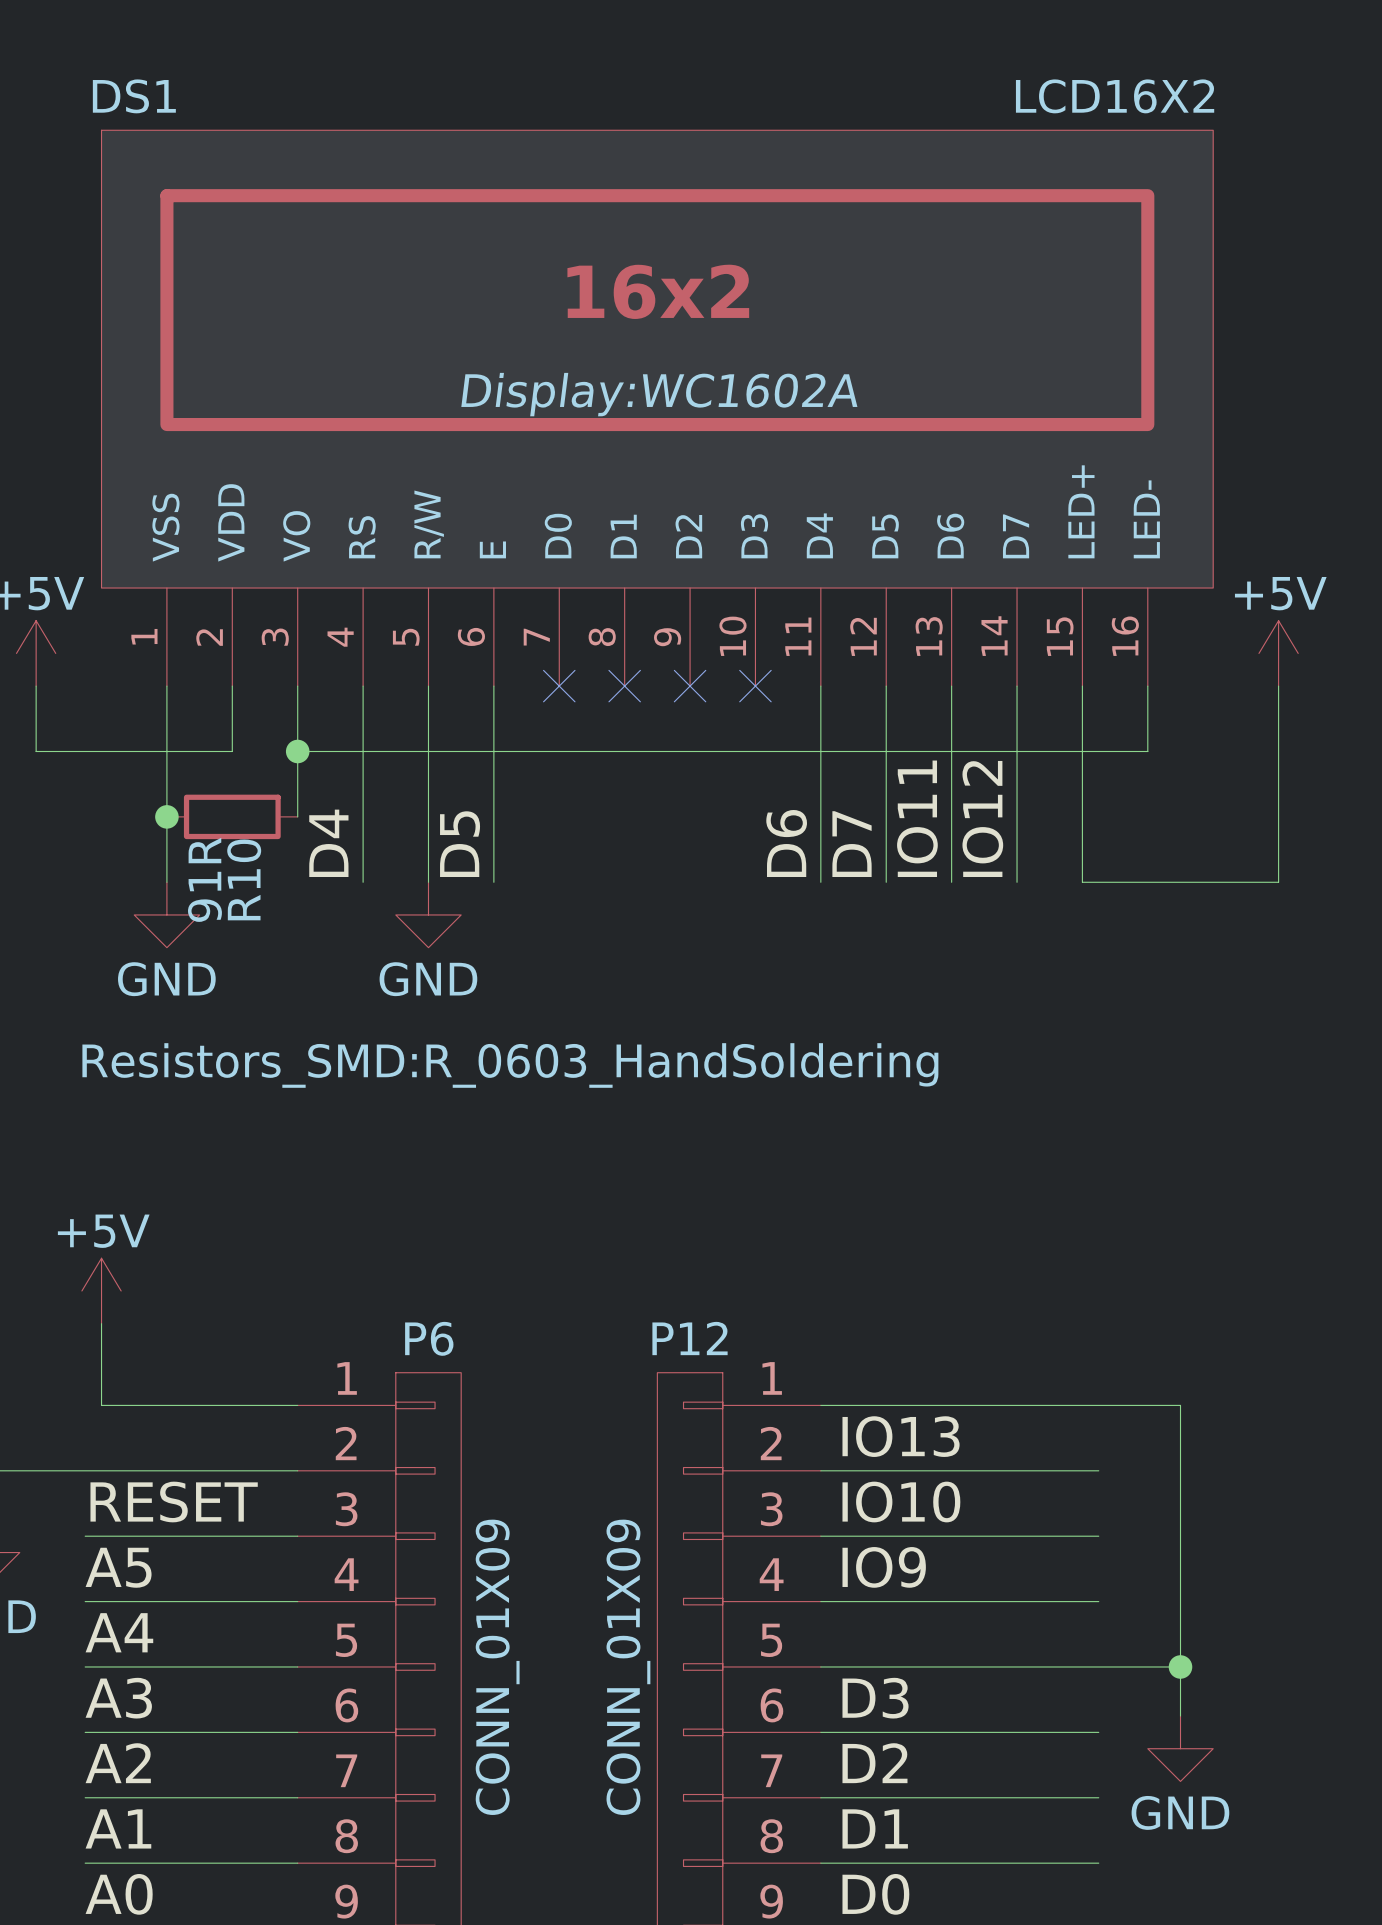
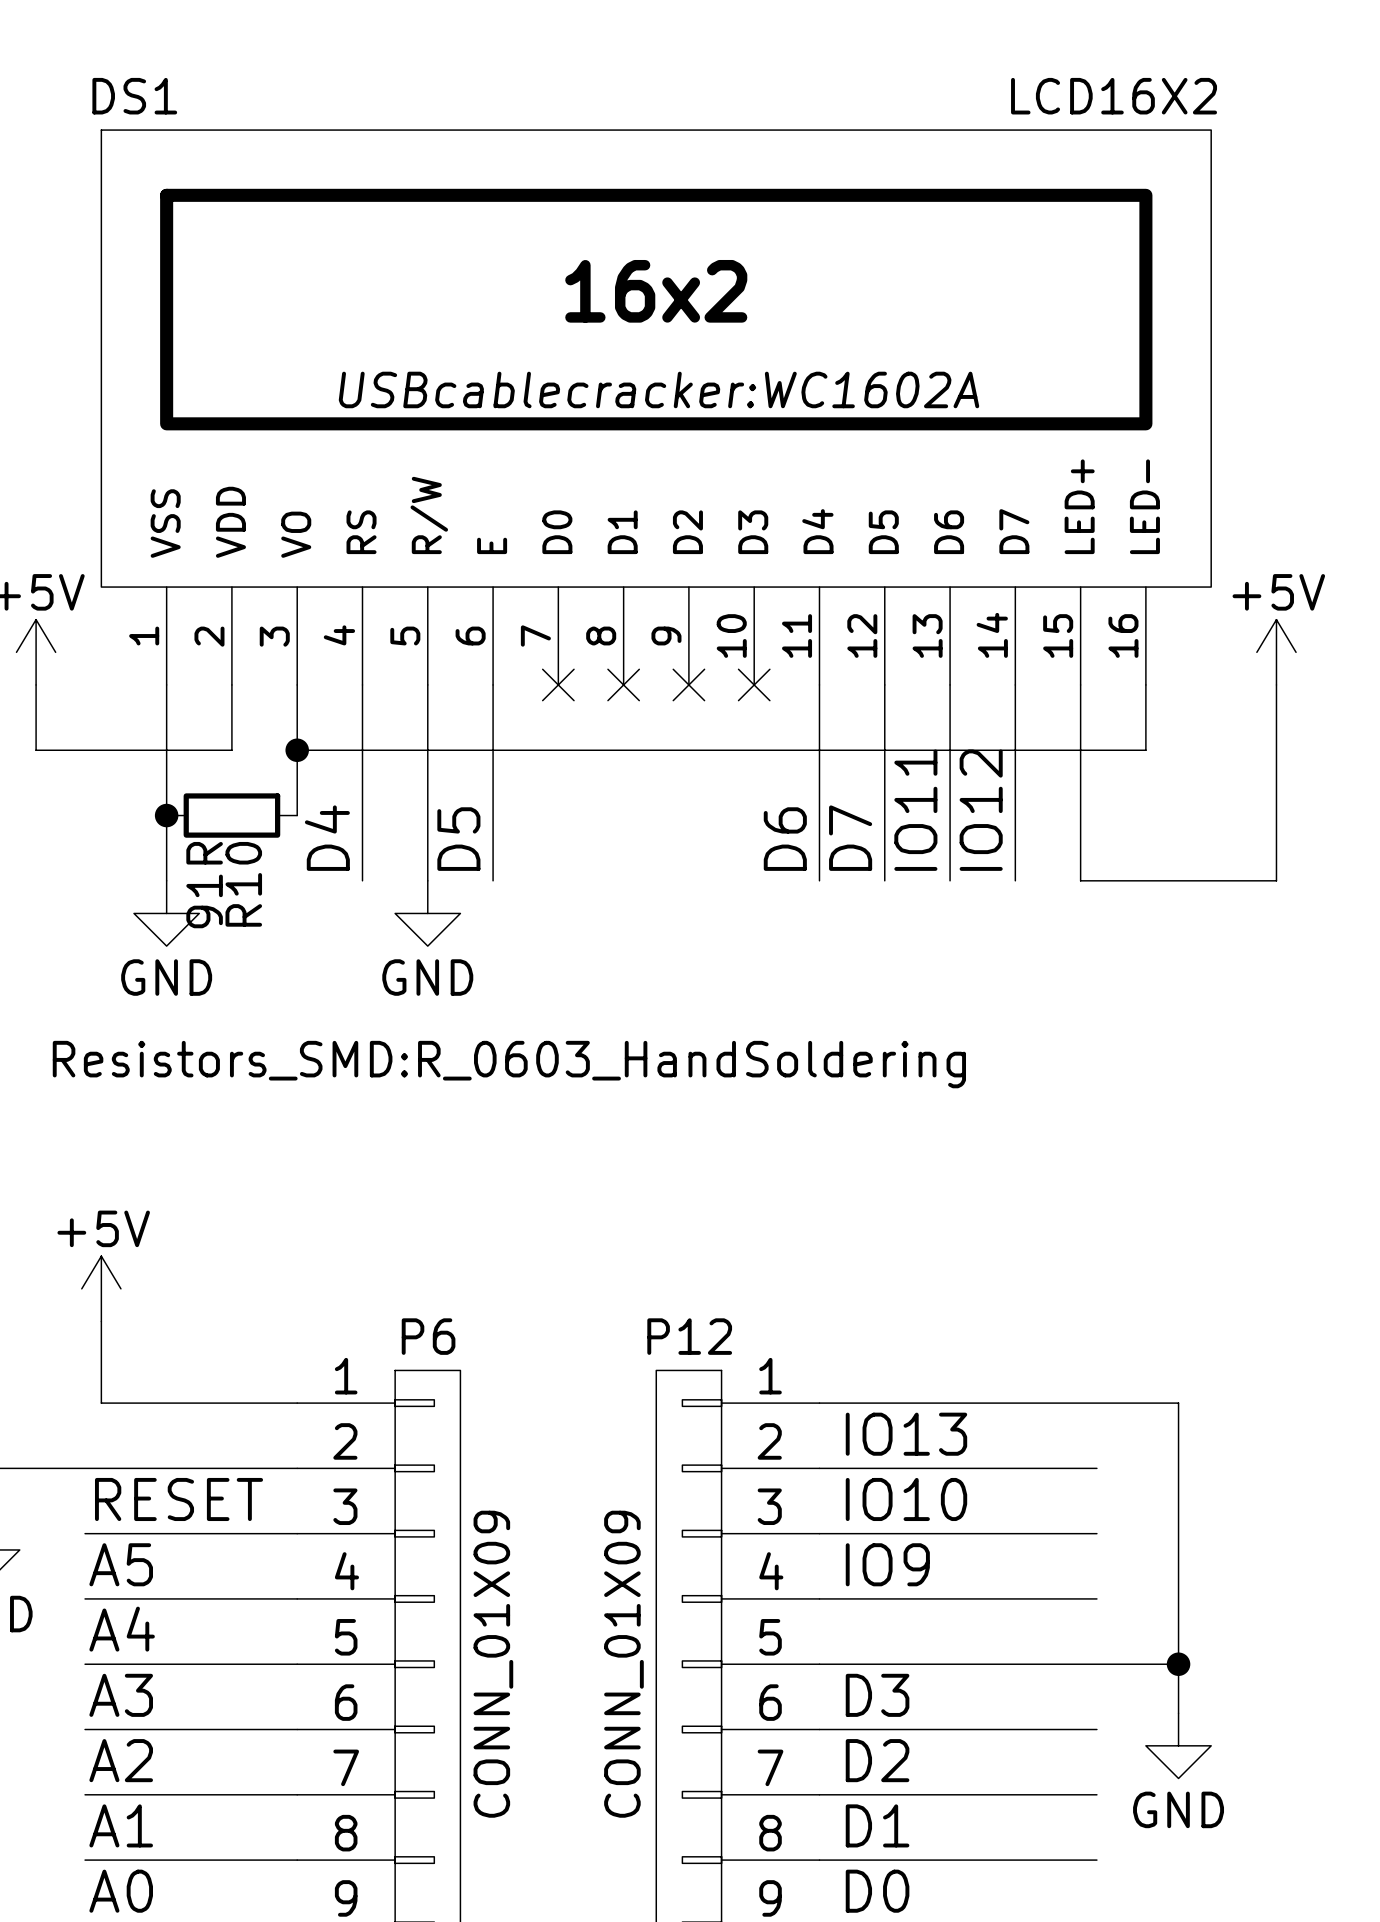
DS1 text: Display:WC1602A (659, 394) -> USBcablecracker:WC1602A (658, 389)

